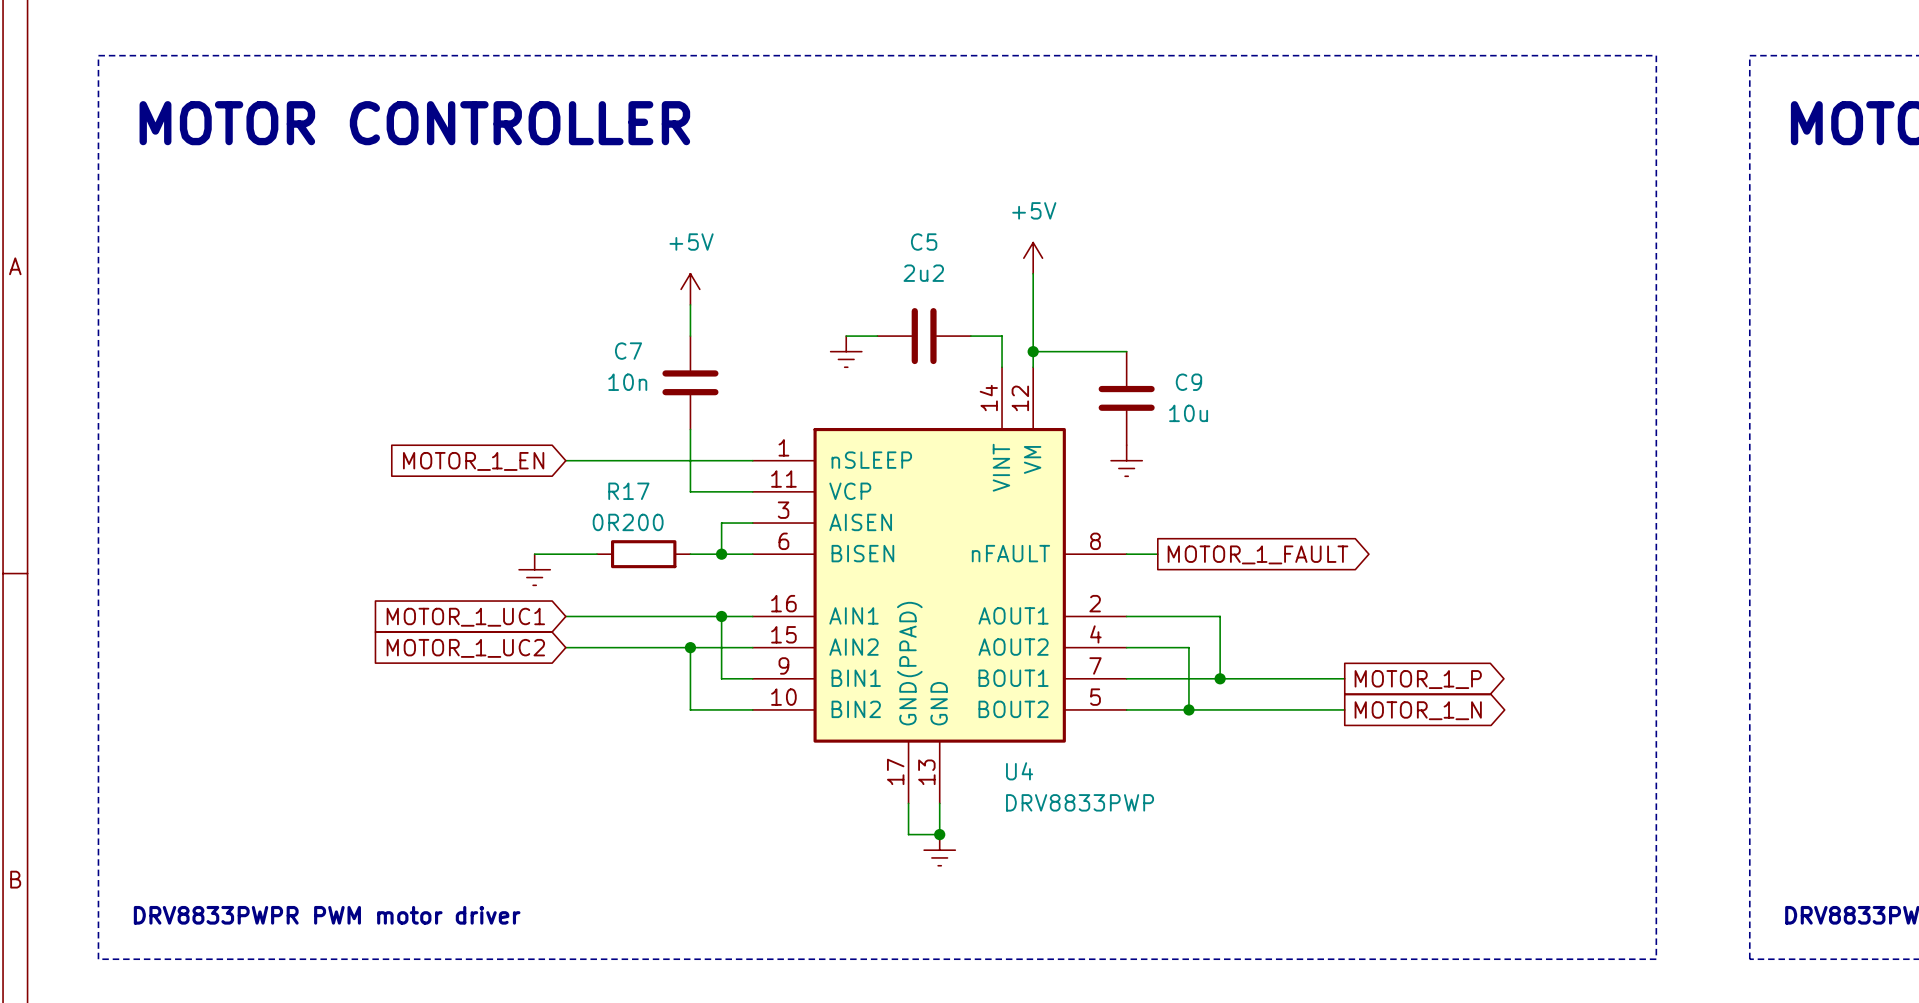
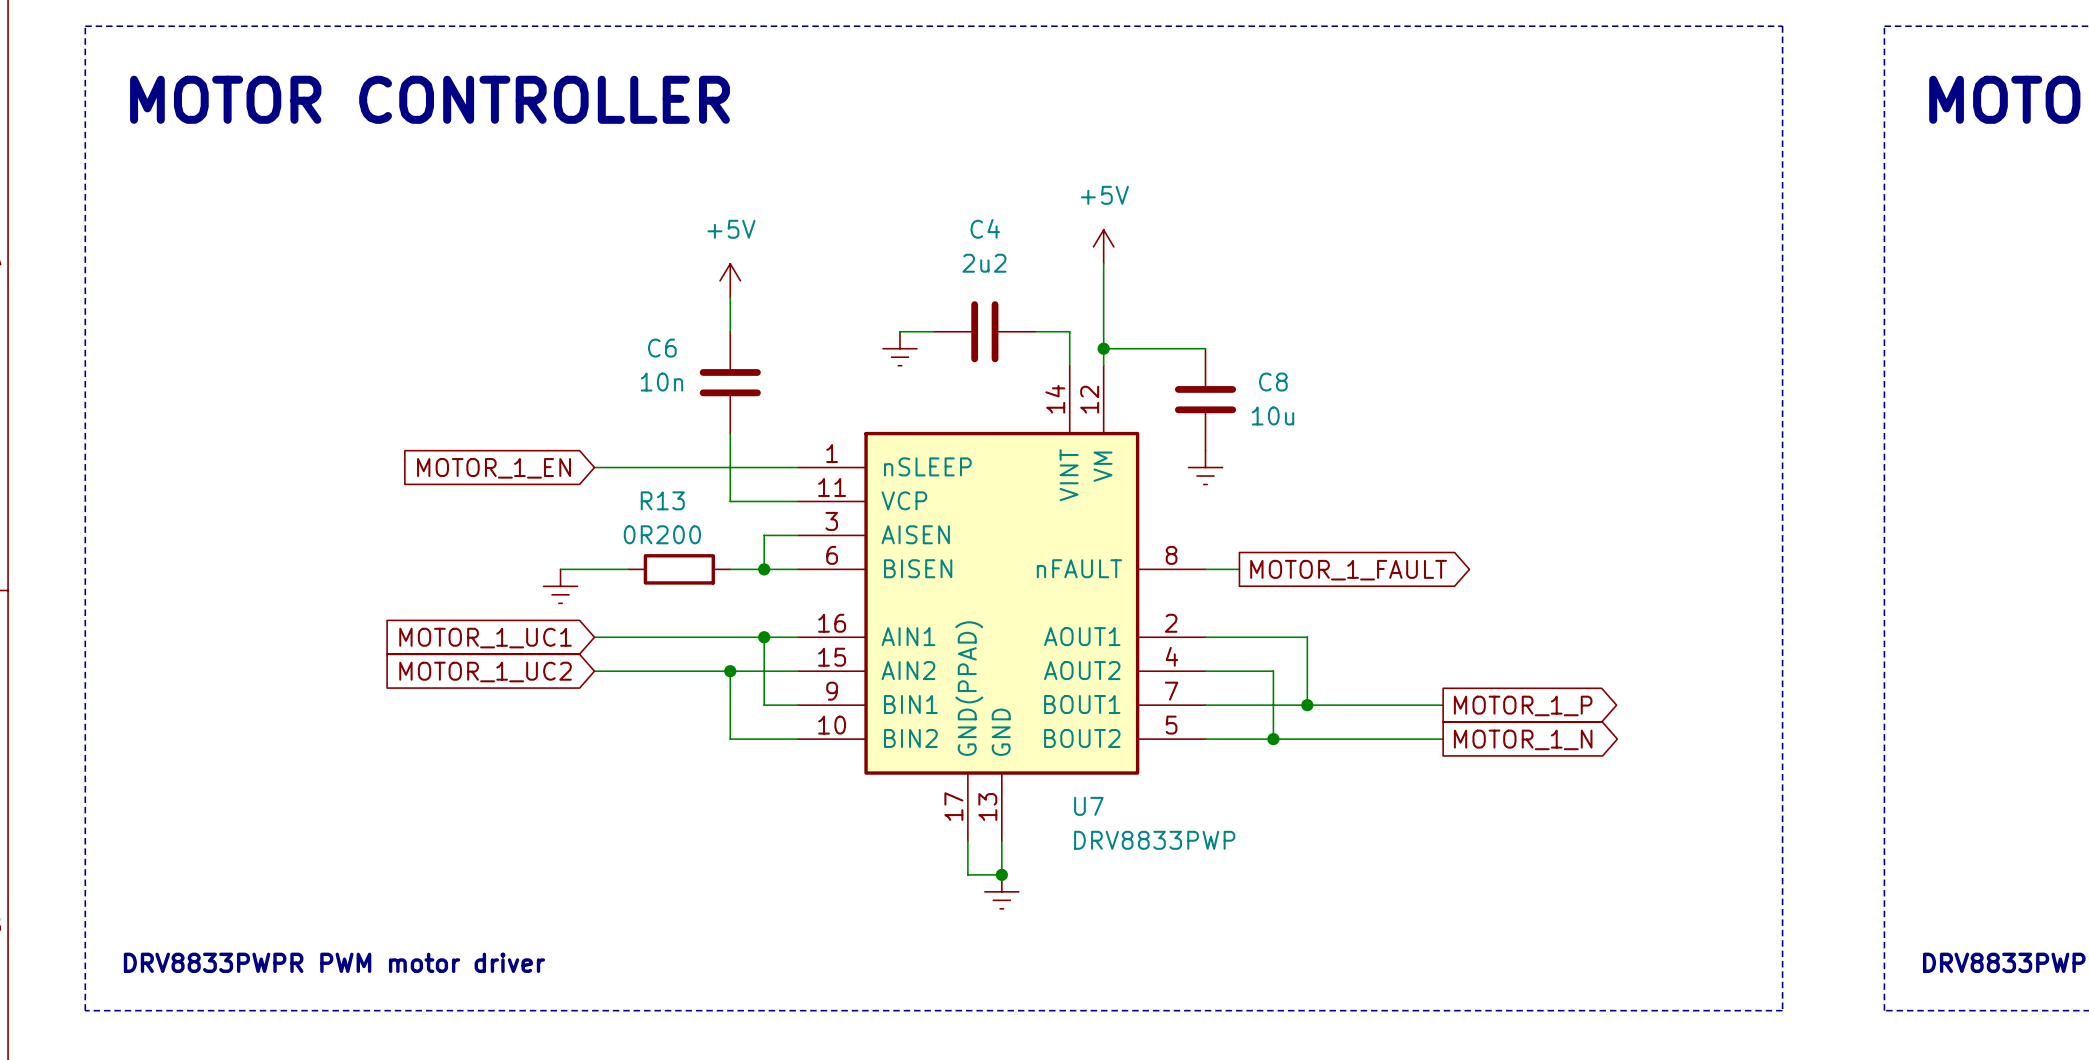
C5 name: C5 (924, 242) -> C4 (985, 228)
C7 name: C7 (628, 351) -> C6 (662, 348)
C9 name: C9 (1188, 382) -> C8 (1273, 382)
R17 name: R17 (628, 491) -> R13 (662, 500)
U4 name: U4 (1019, 771) -> U7 (1088, 806)

